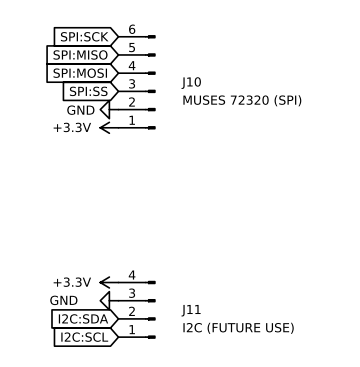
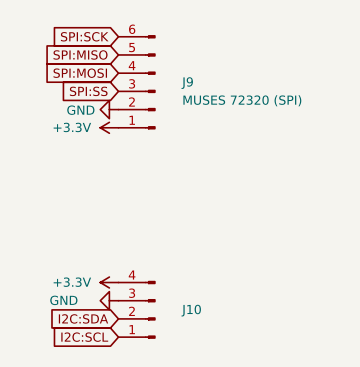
J10 name: J10 (191, 83) -> J9 (187, 83)
J11 name: J11 (191, 310) -> J10 (191, 310)
J11 value: I2C (FUTURE USE) (238, 328) -> none

